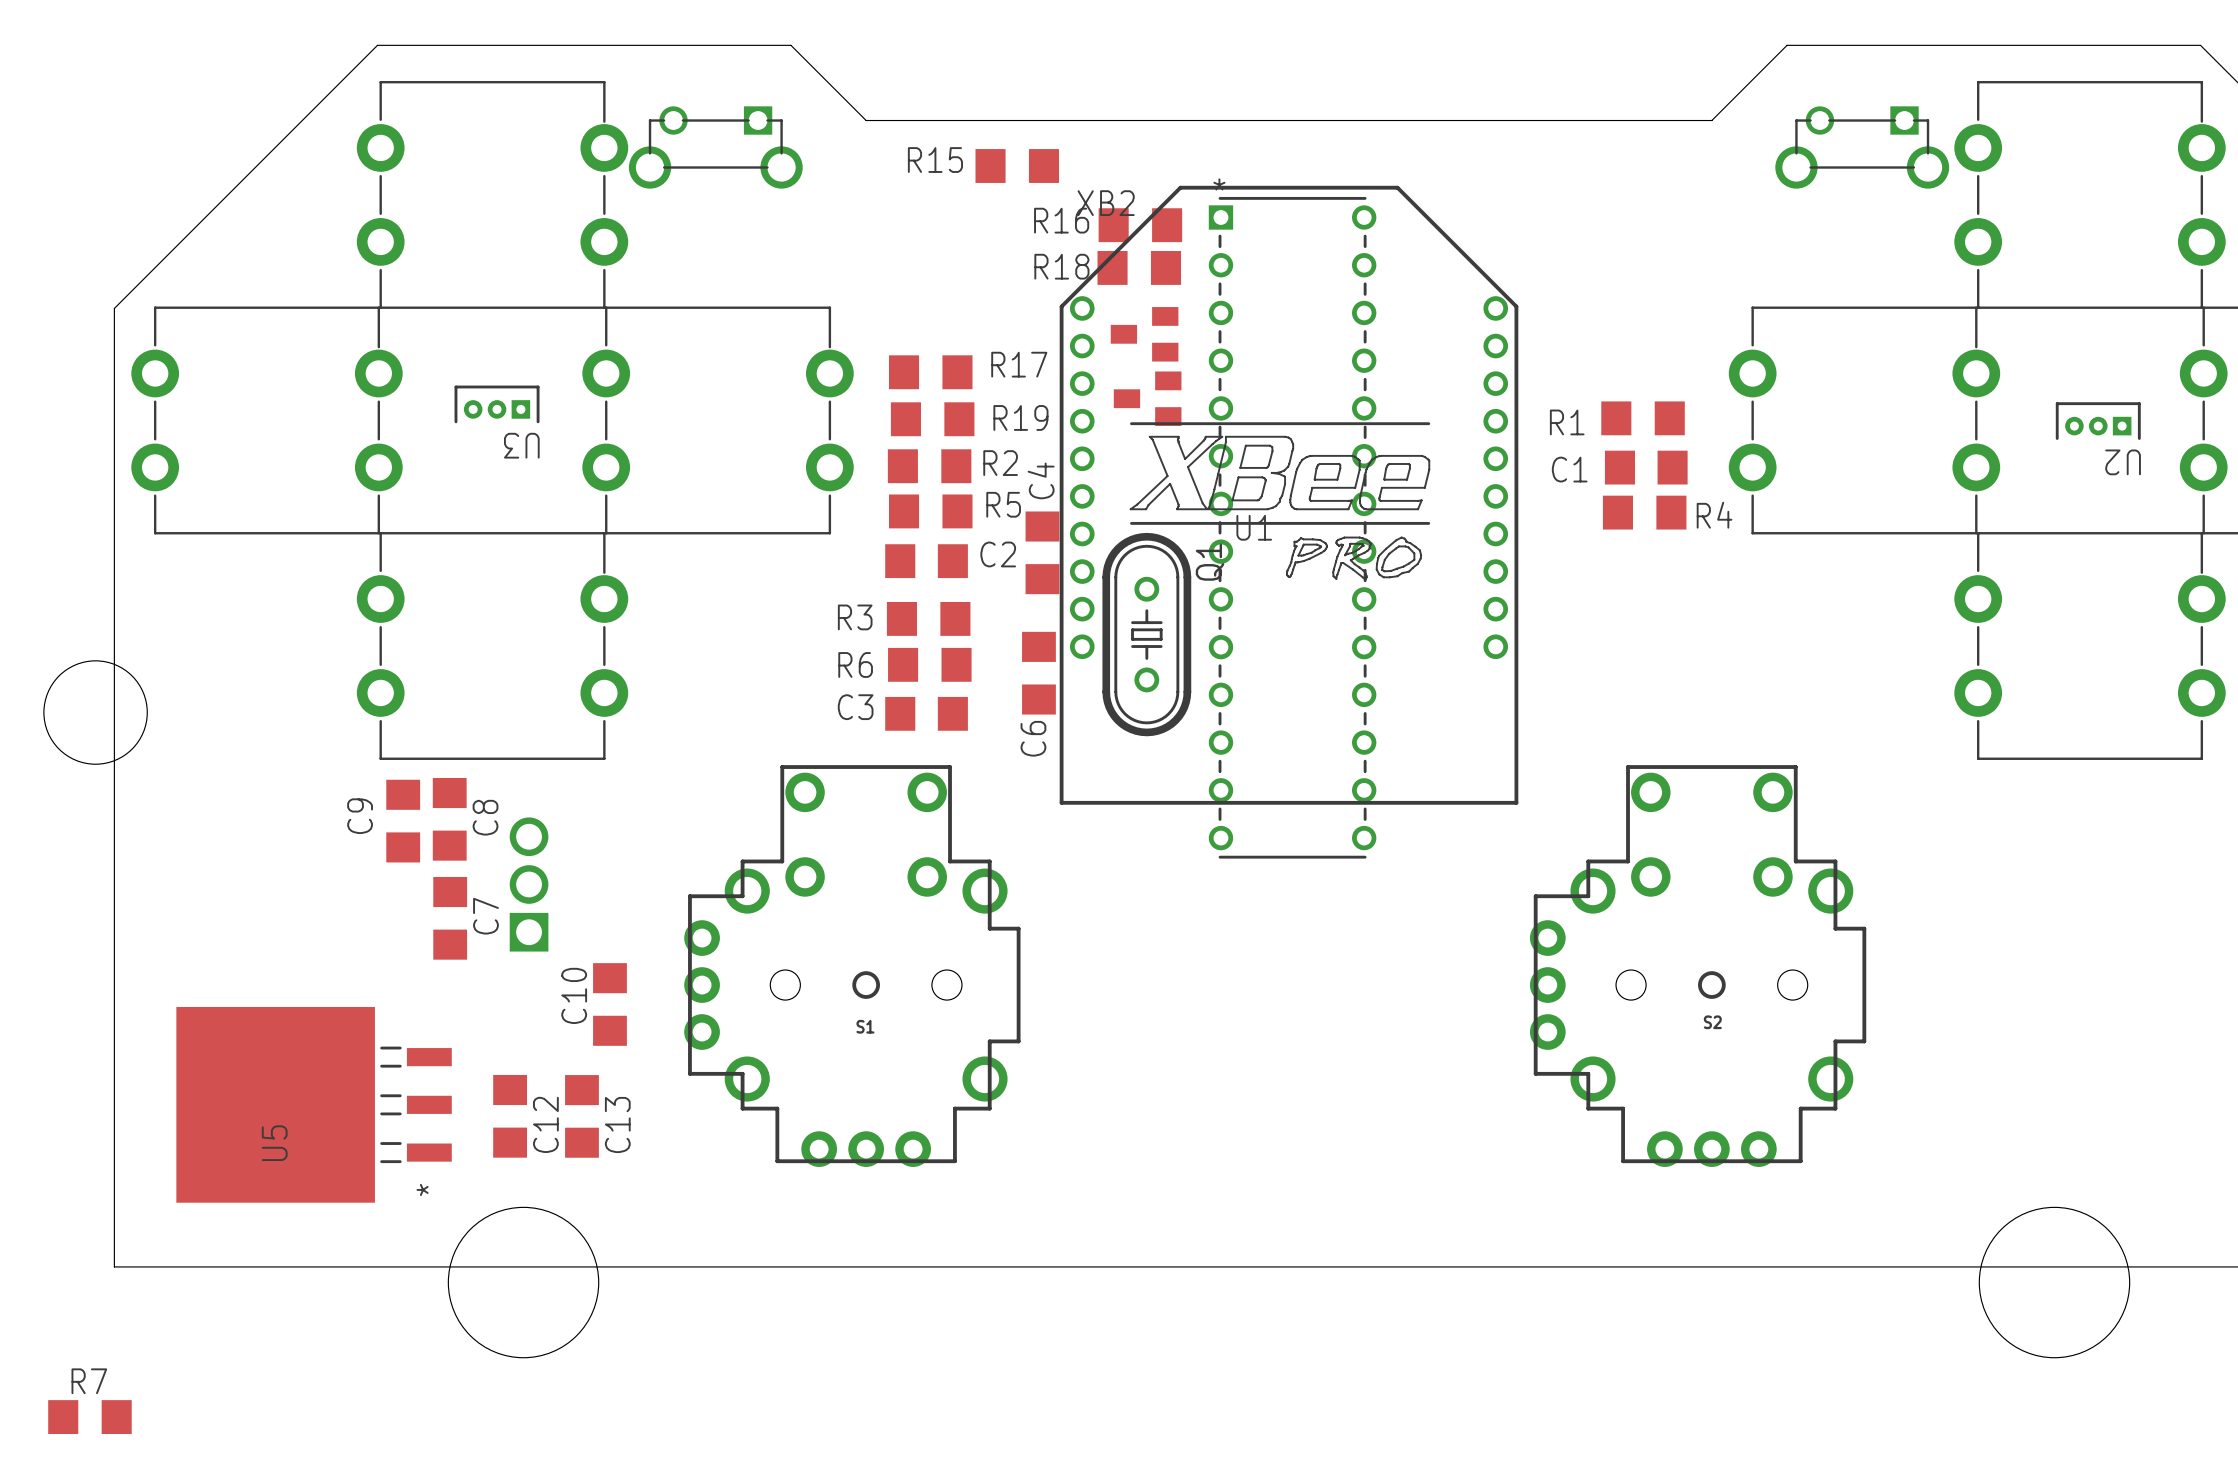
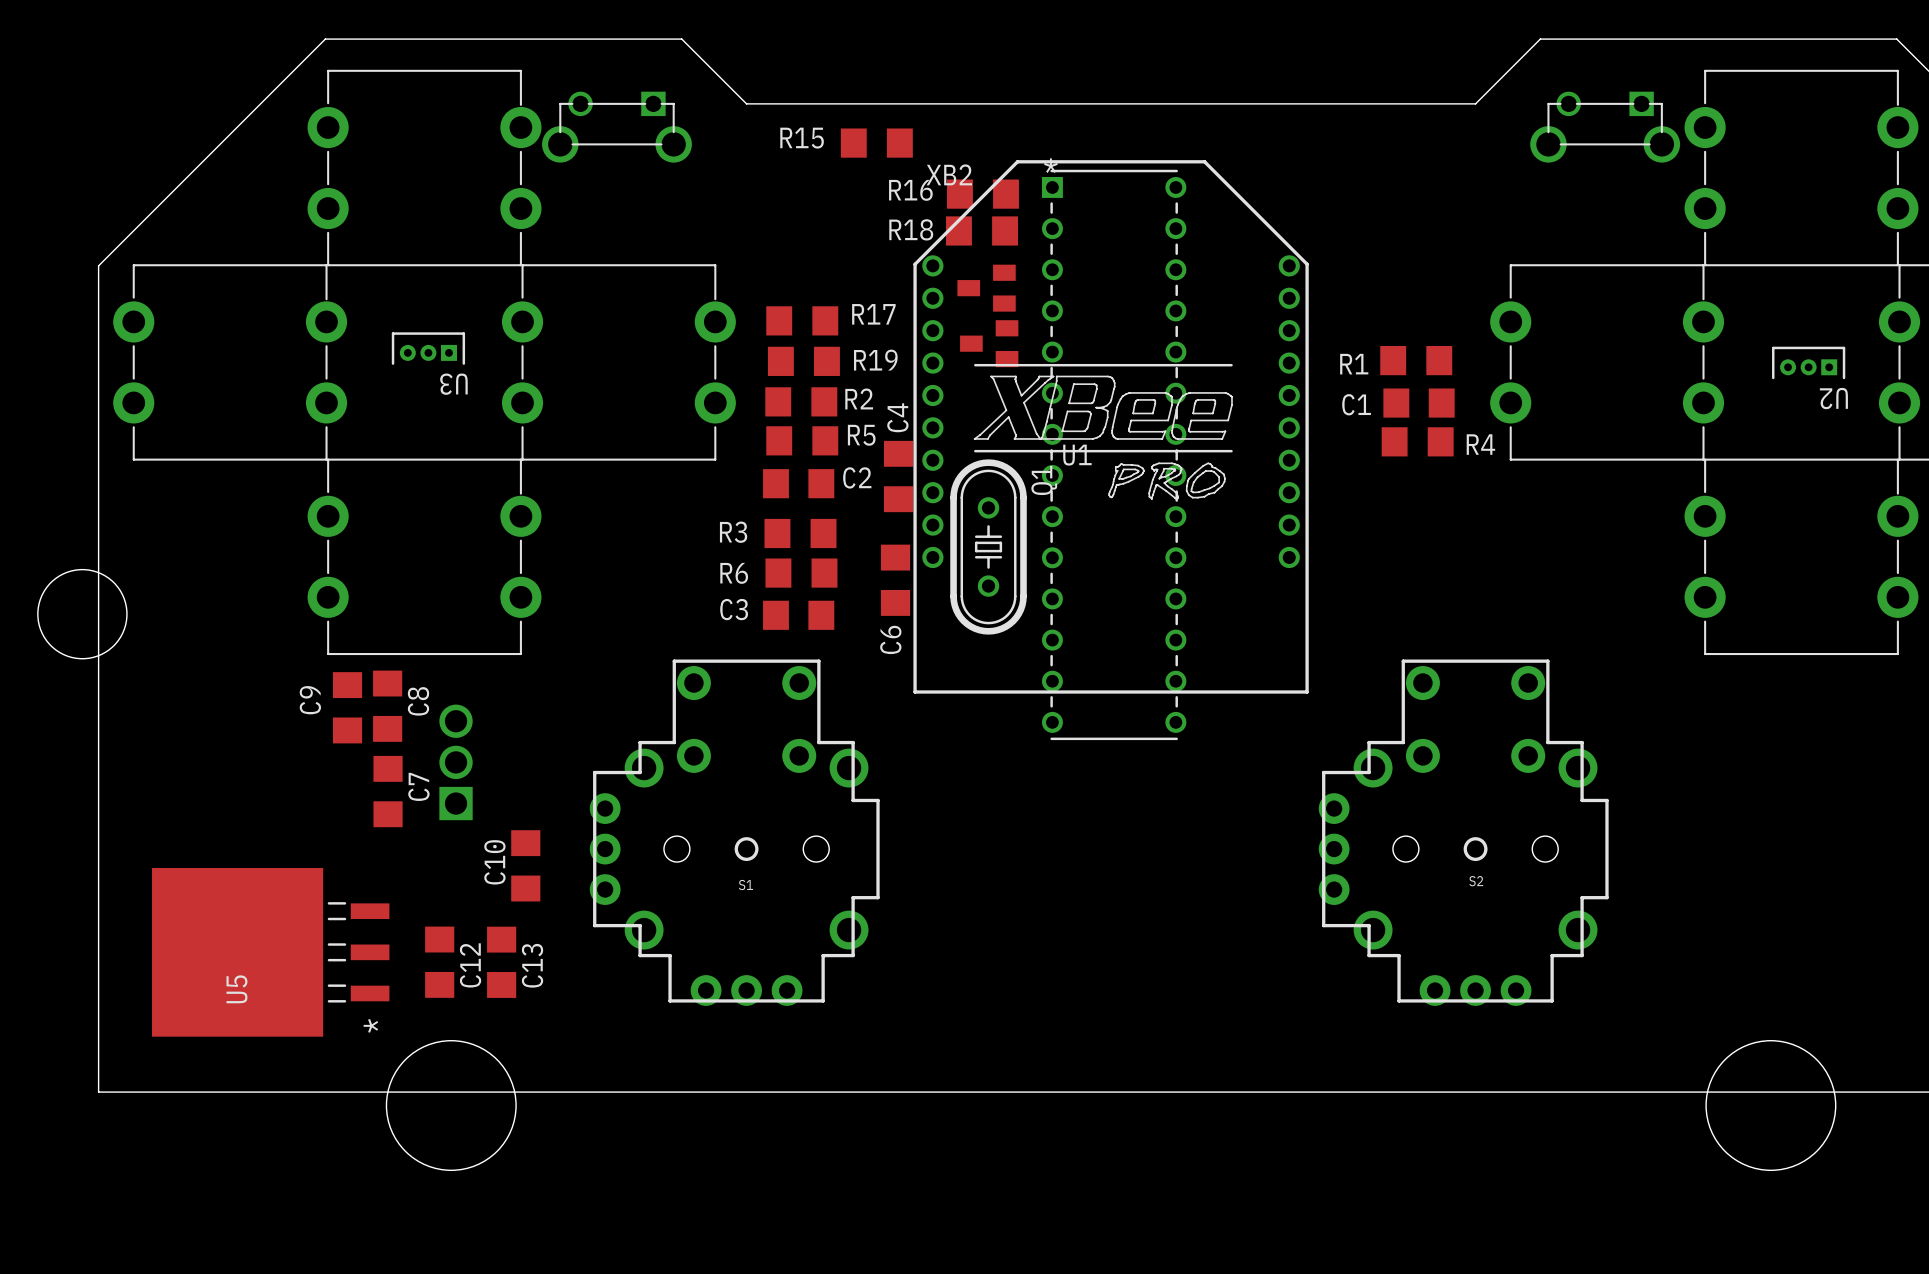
R7: (89, 1417) -> none

